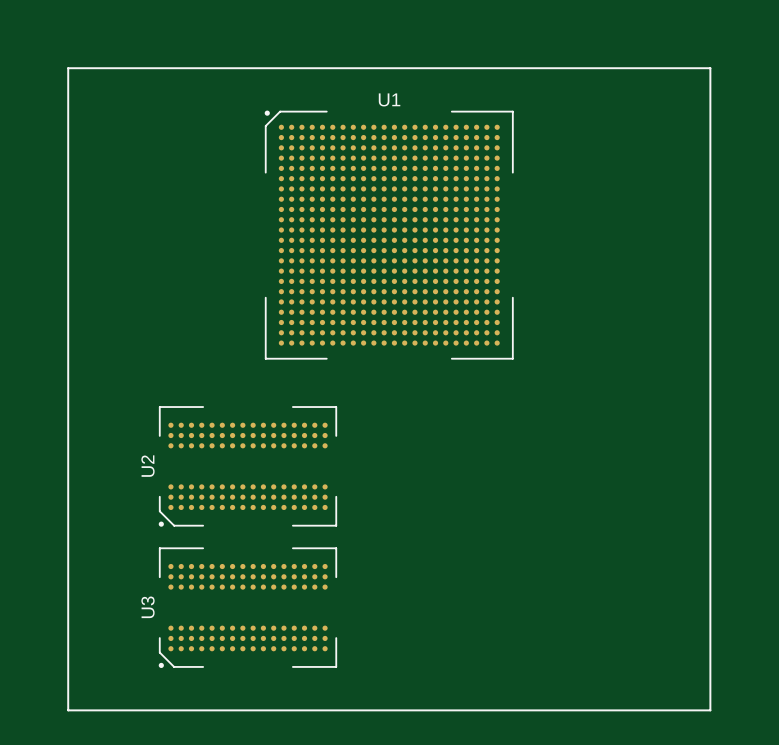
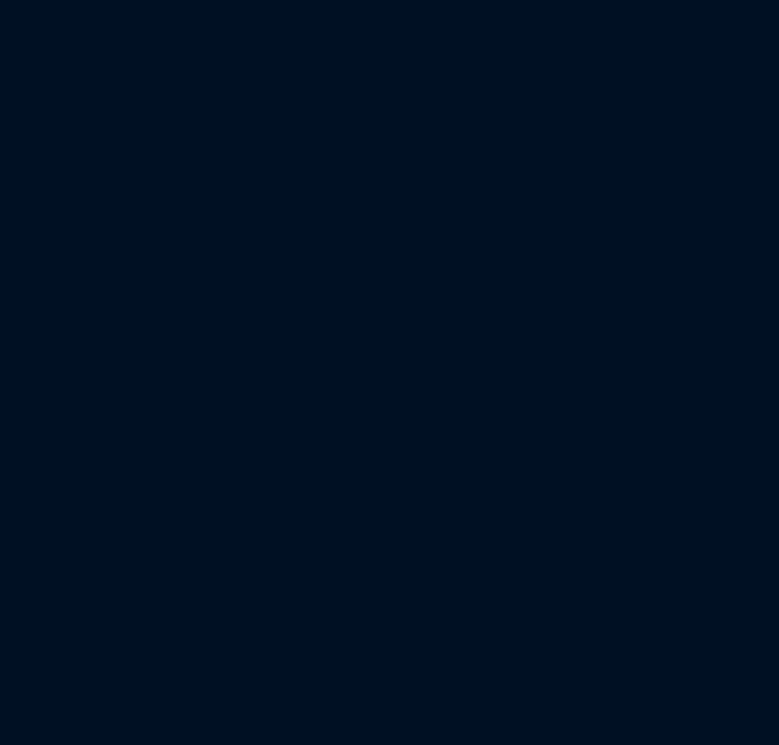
line: (68, 68) (68, 710) (710, 710) (710, 68) (68, 68) -> none
U1: (389, 235) -> none
U2: (247, 466) -> none
U3: (247, 607) -> none

